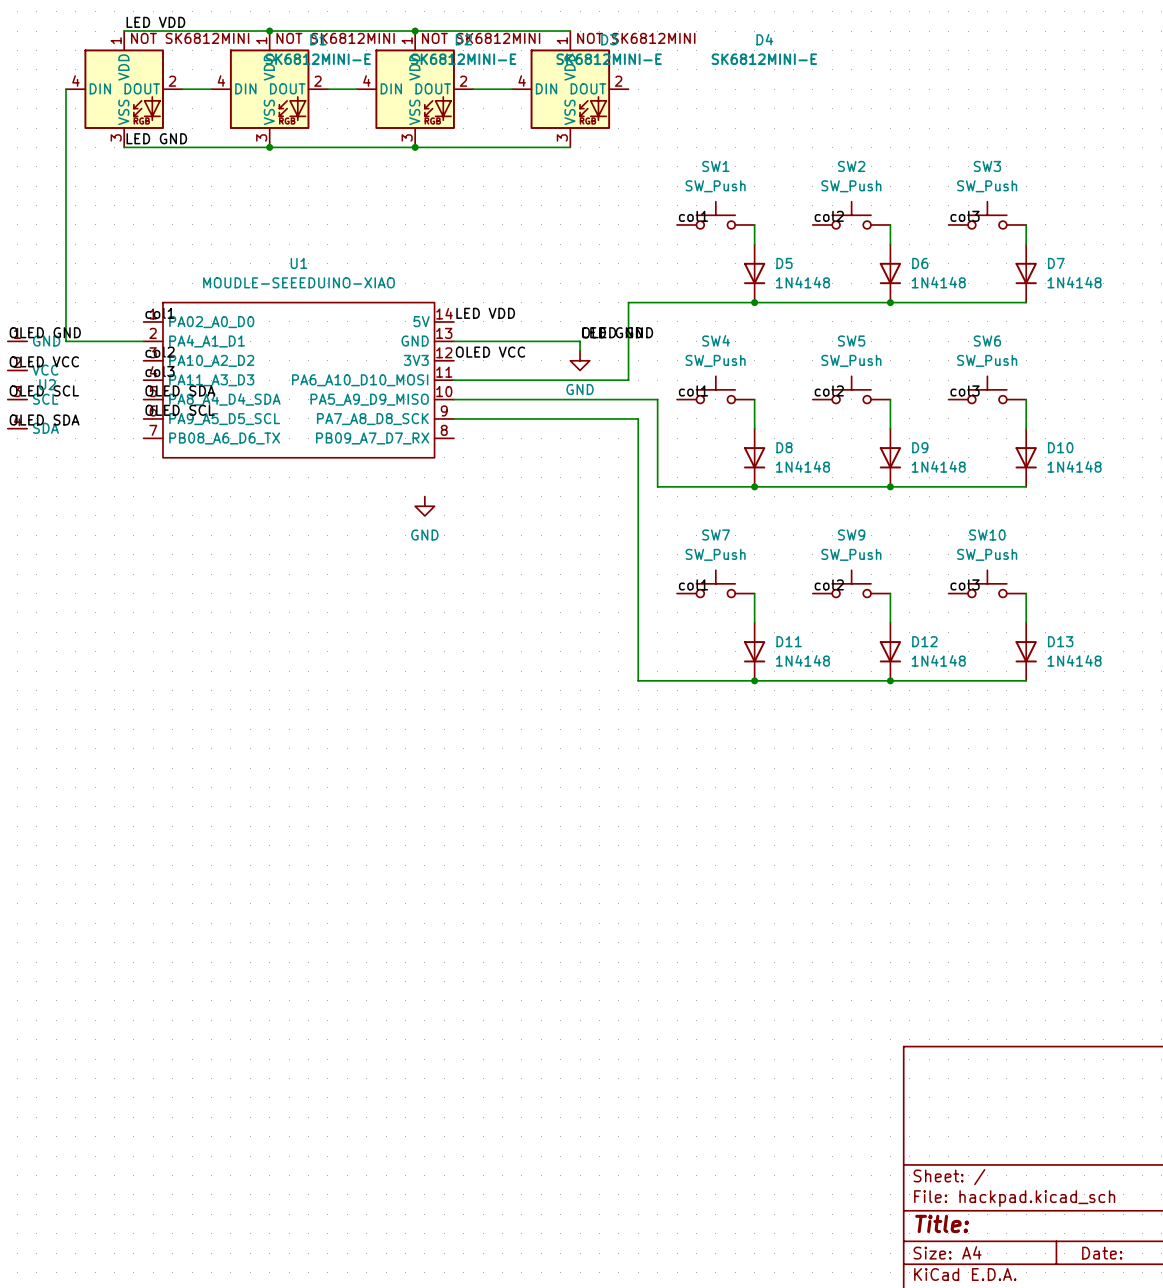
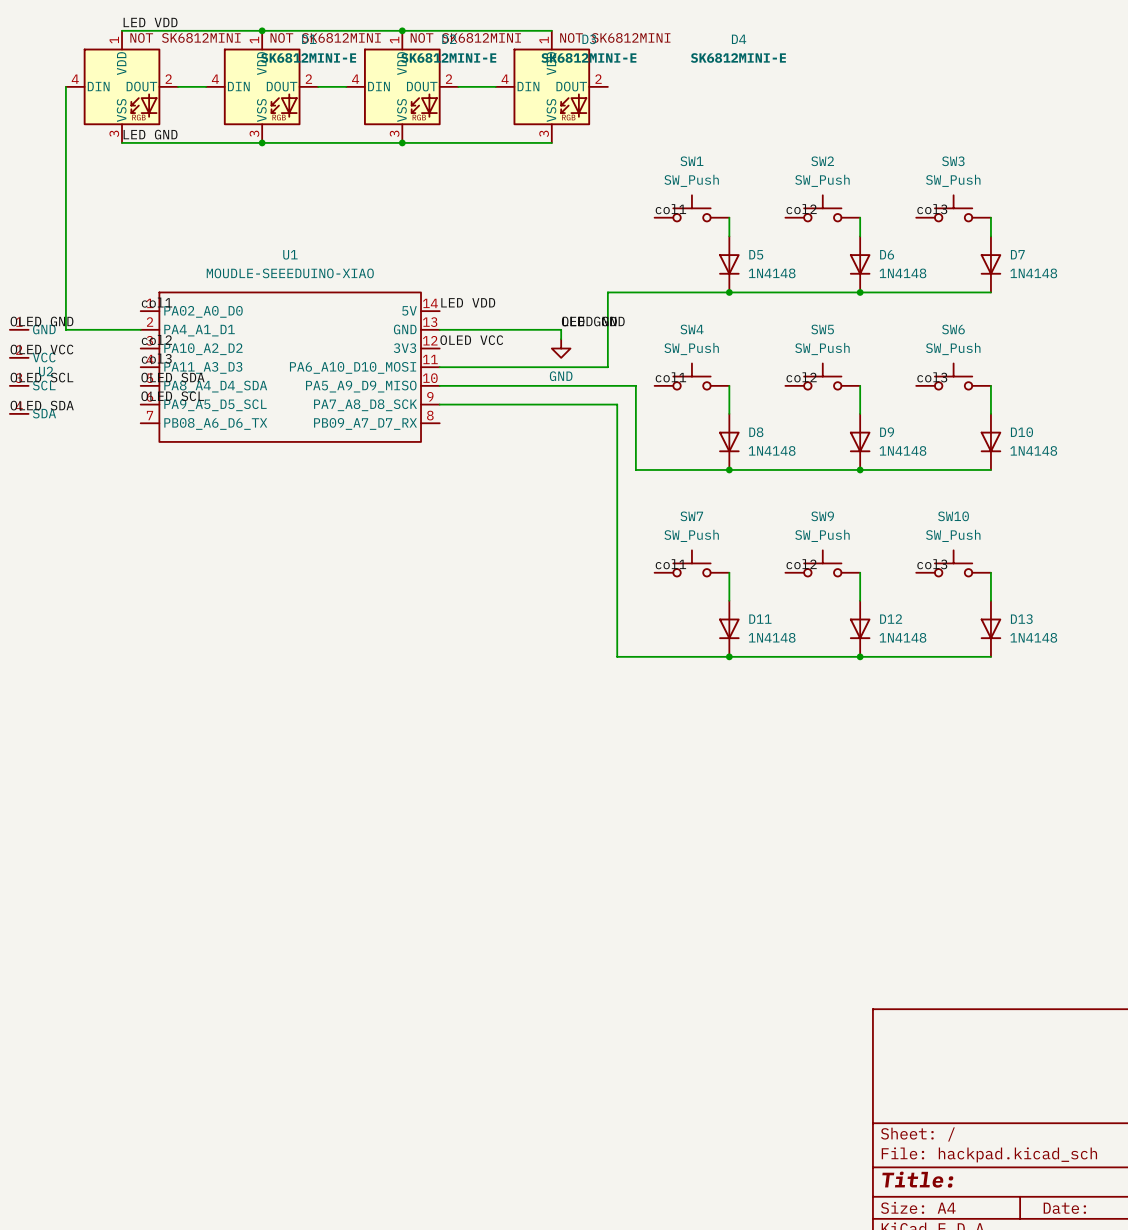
power symbol: GND (424, 506) -> none

